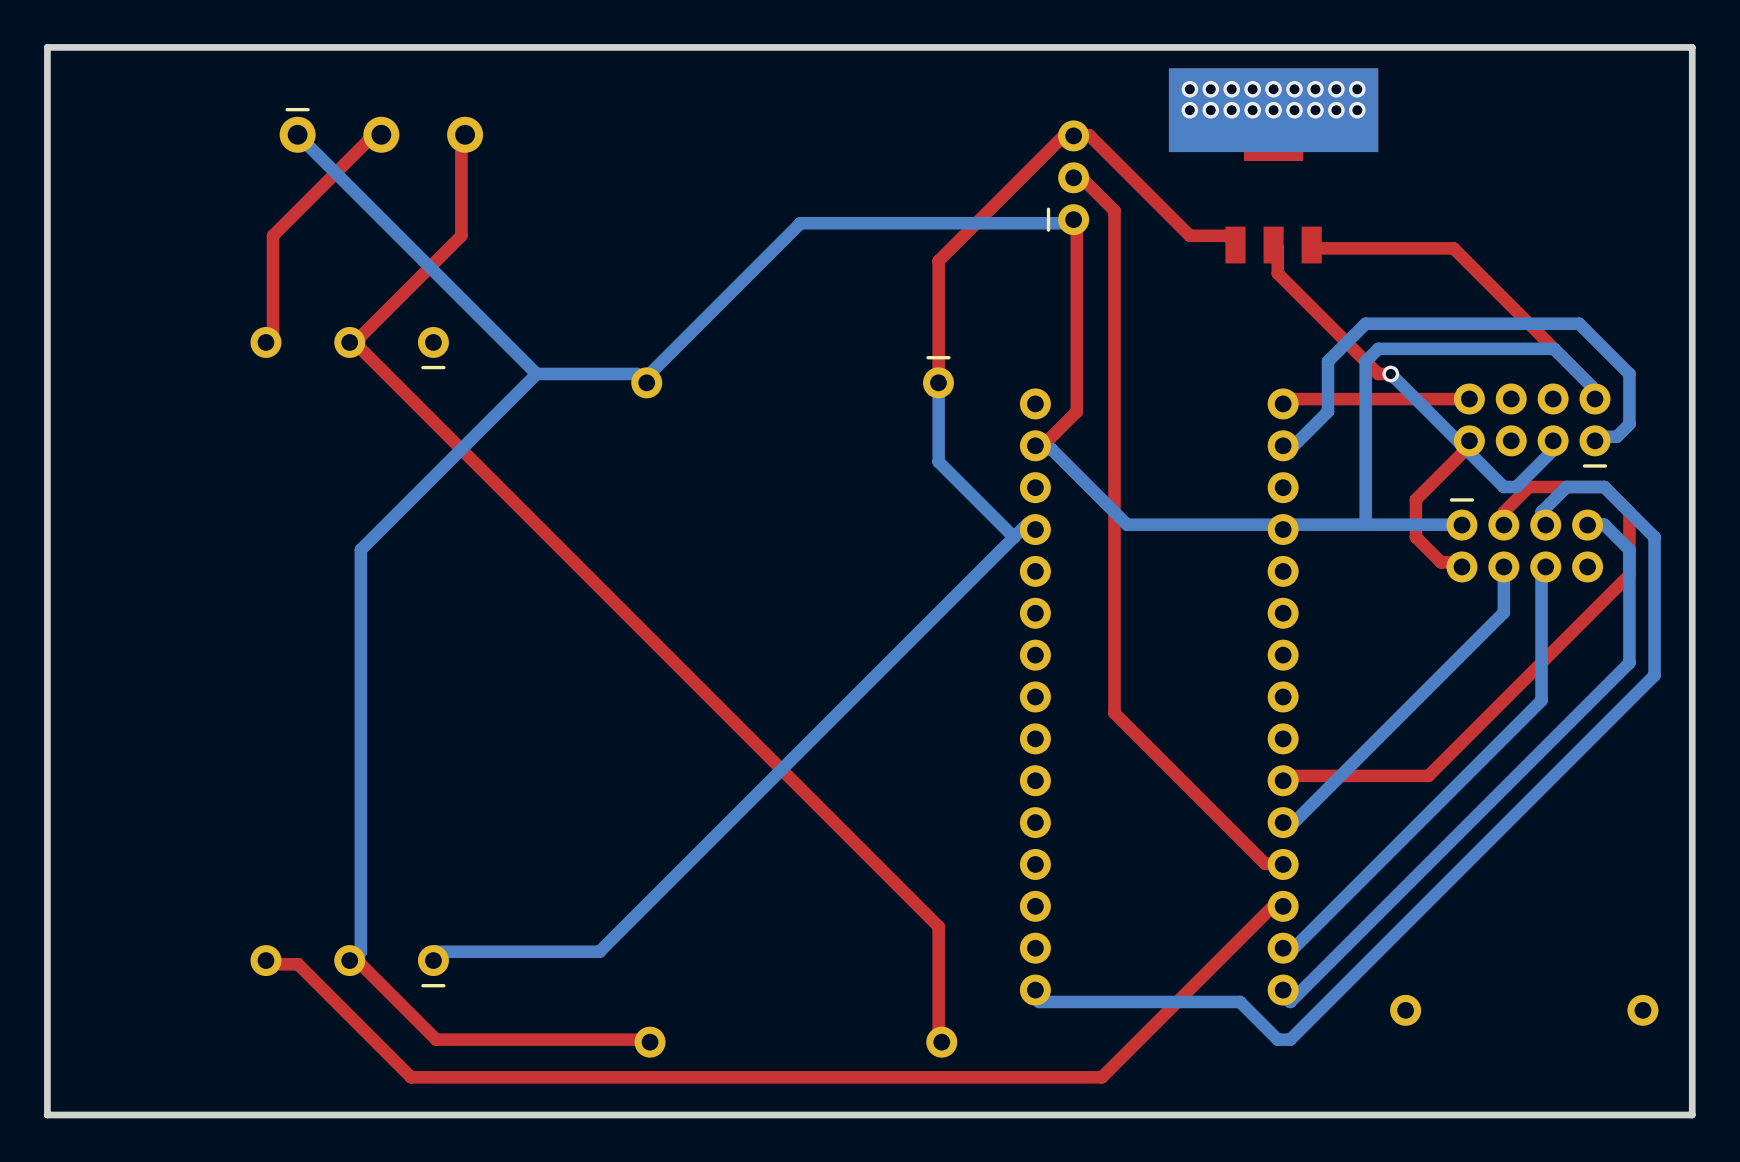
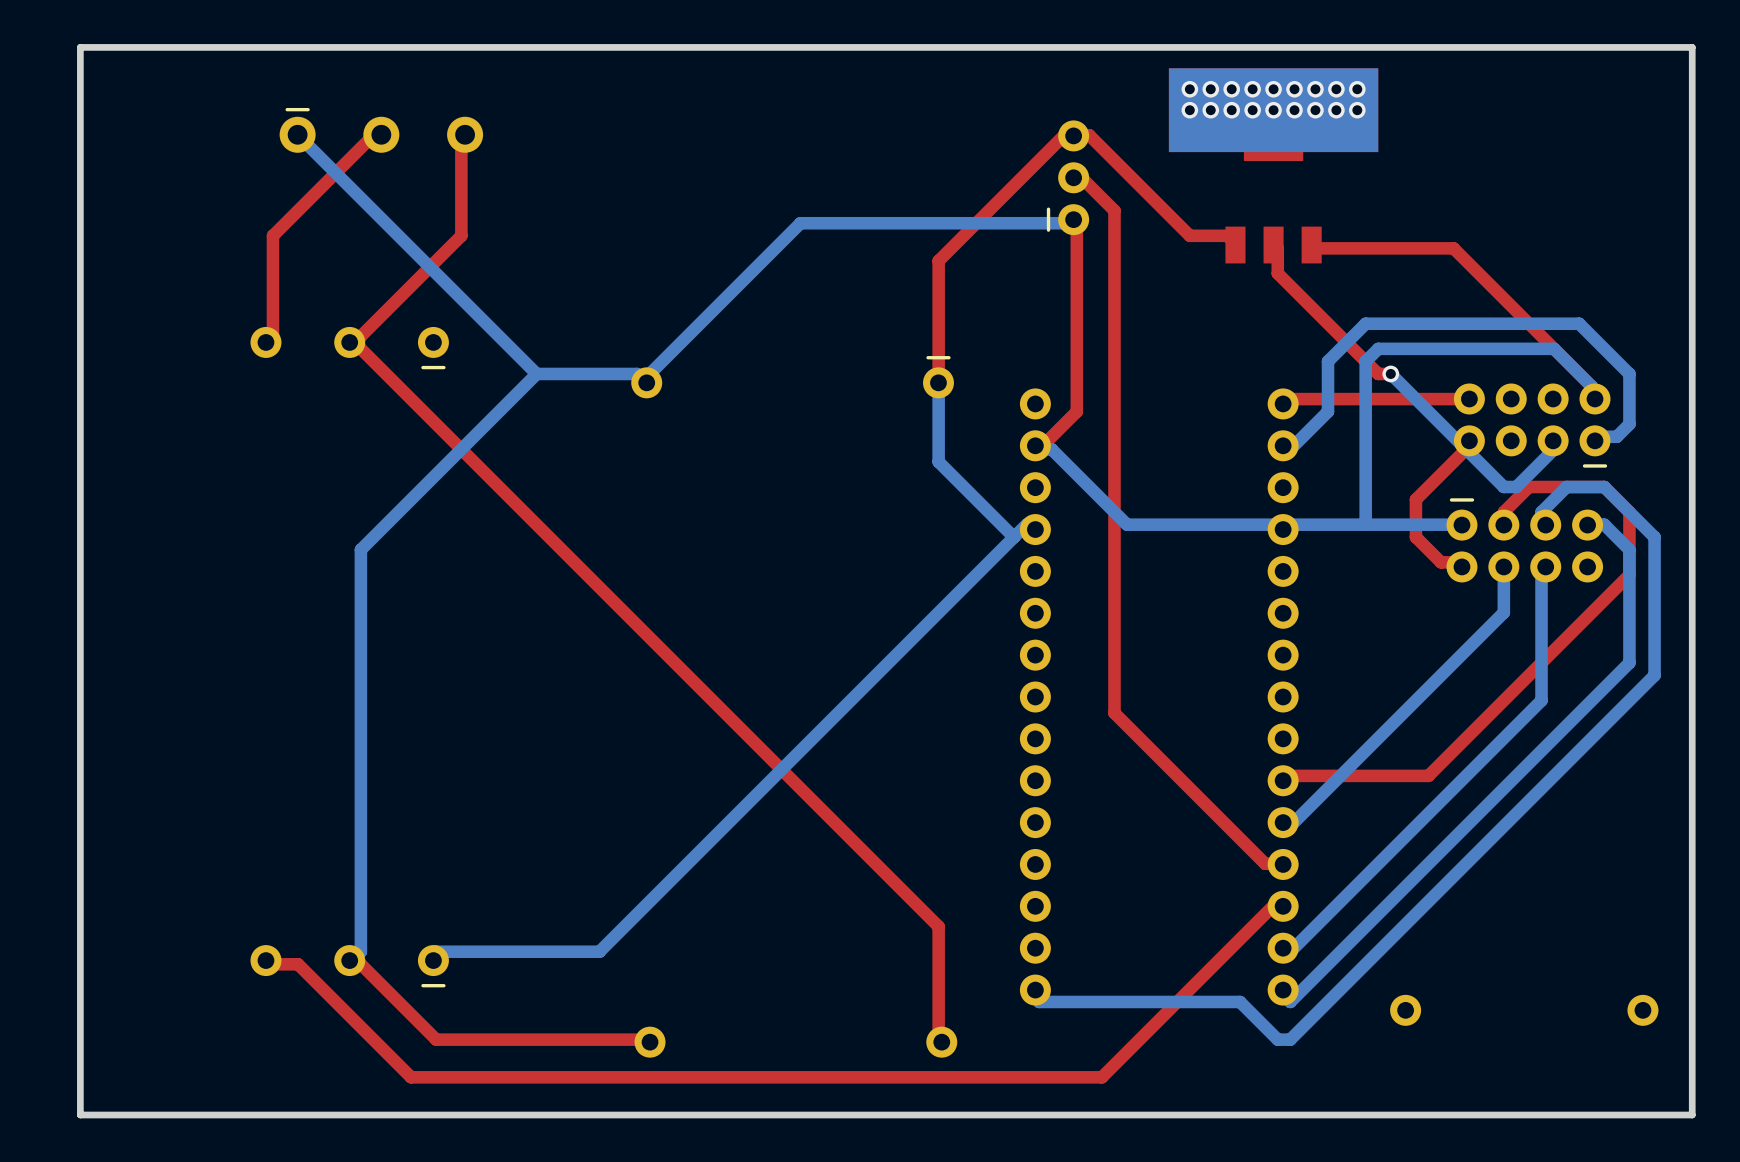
board edge: (80, 47) (47, 47) (47, 1115) (80, 1115) -> (80, 47) (80, 1115)

